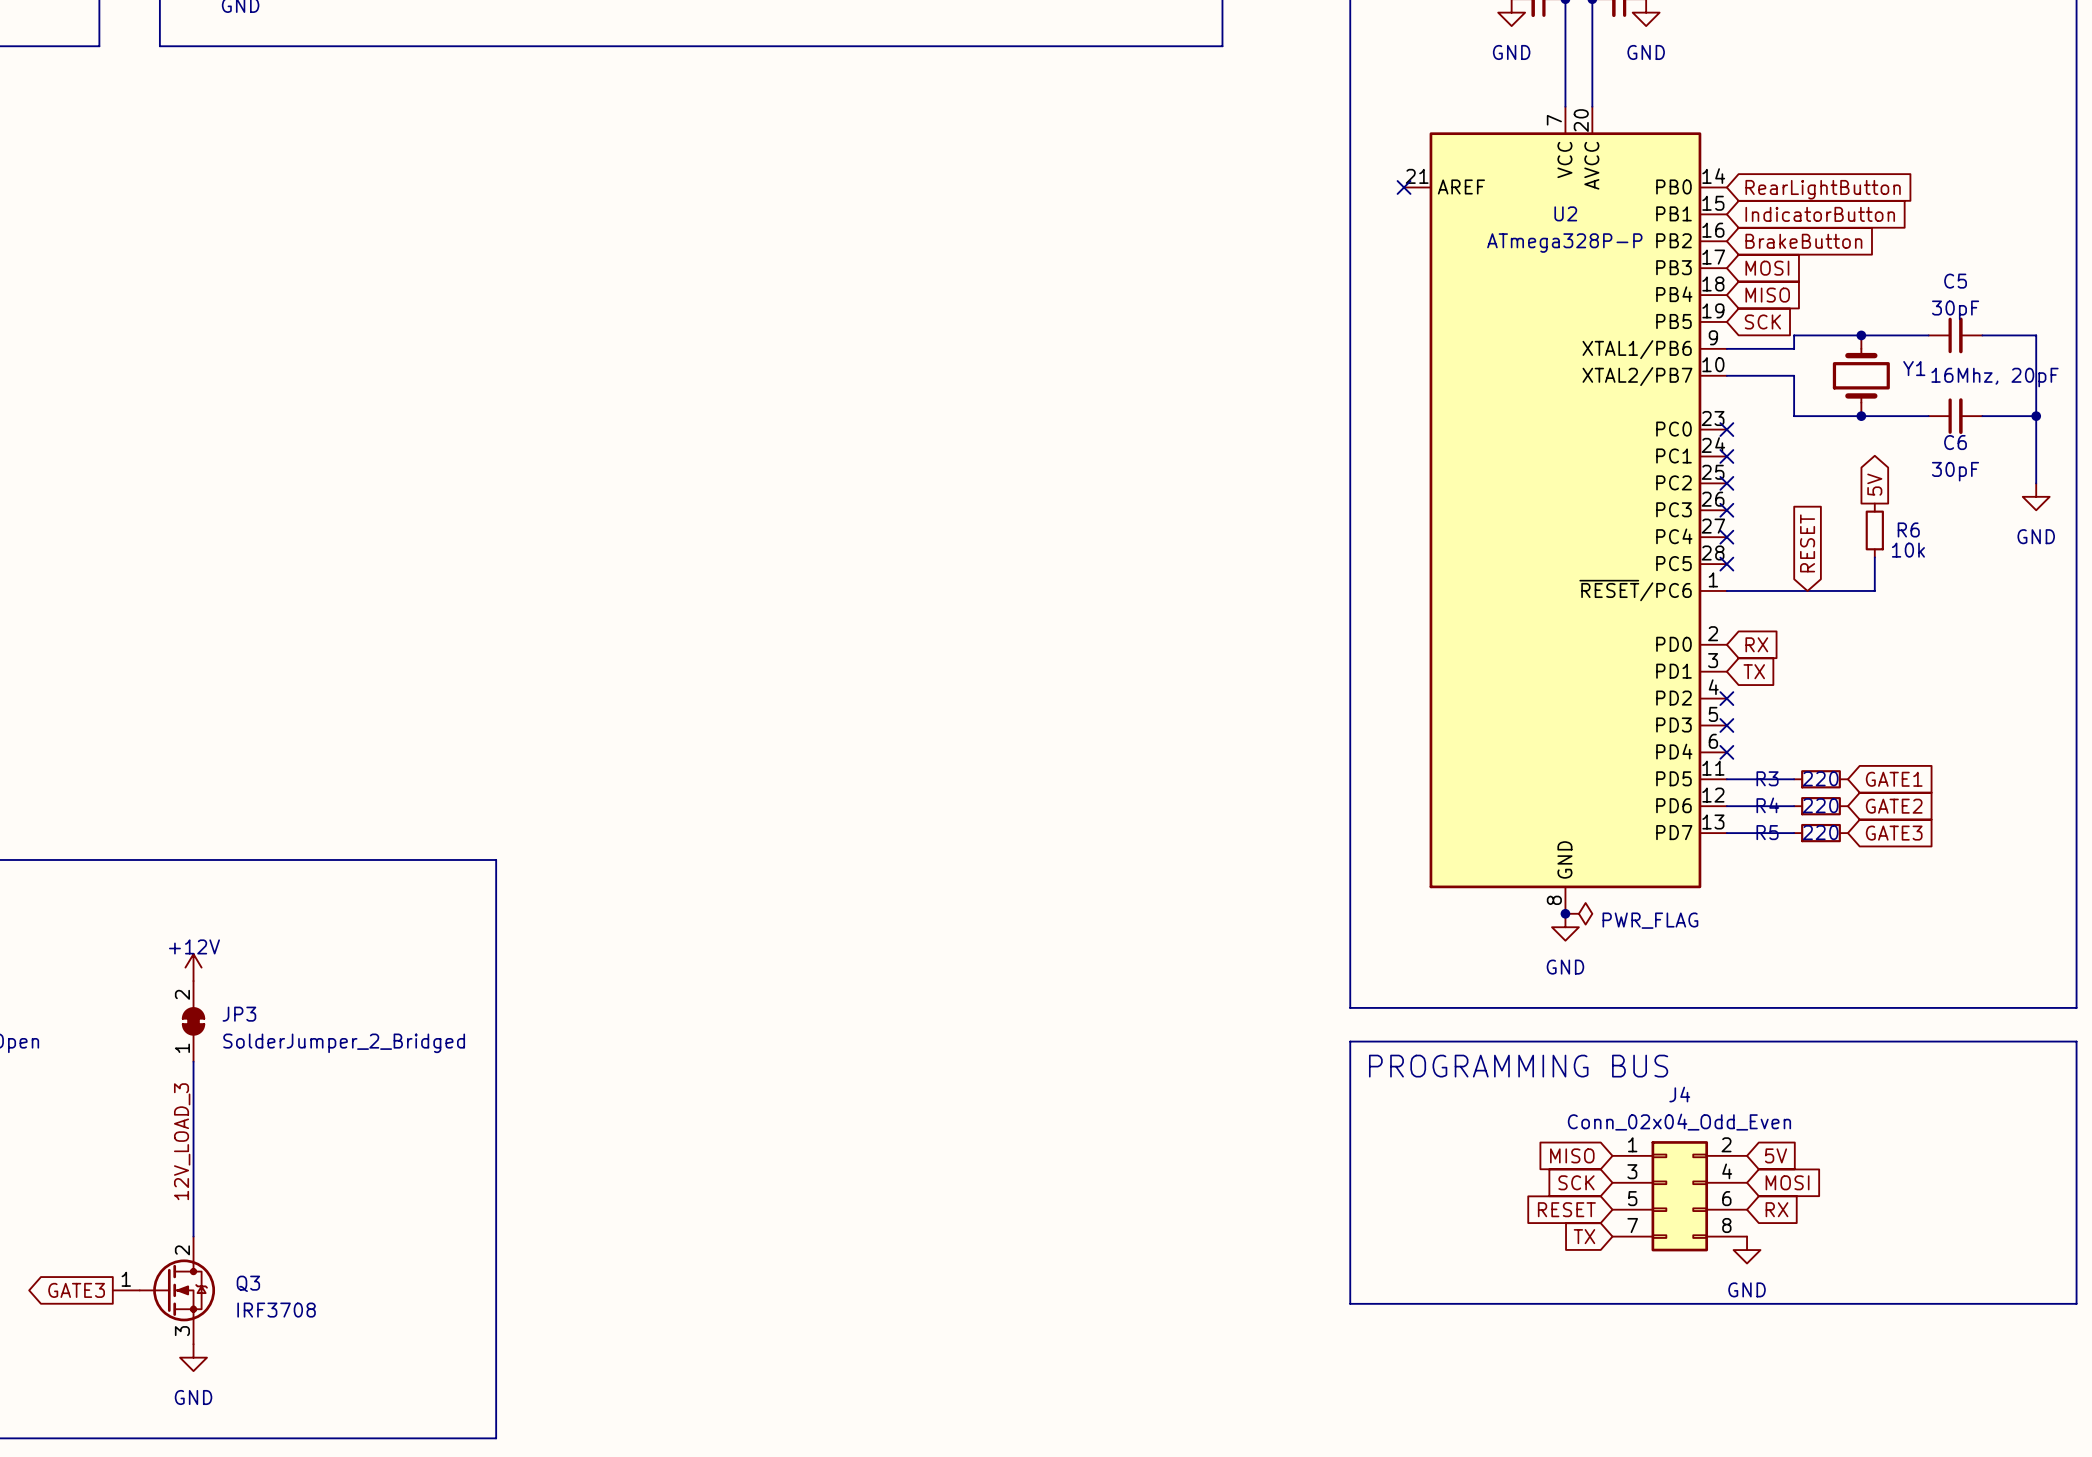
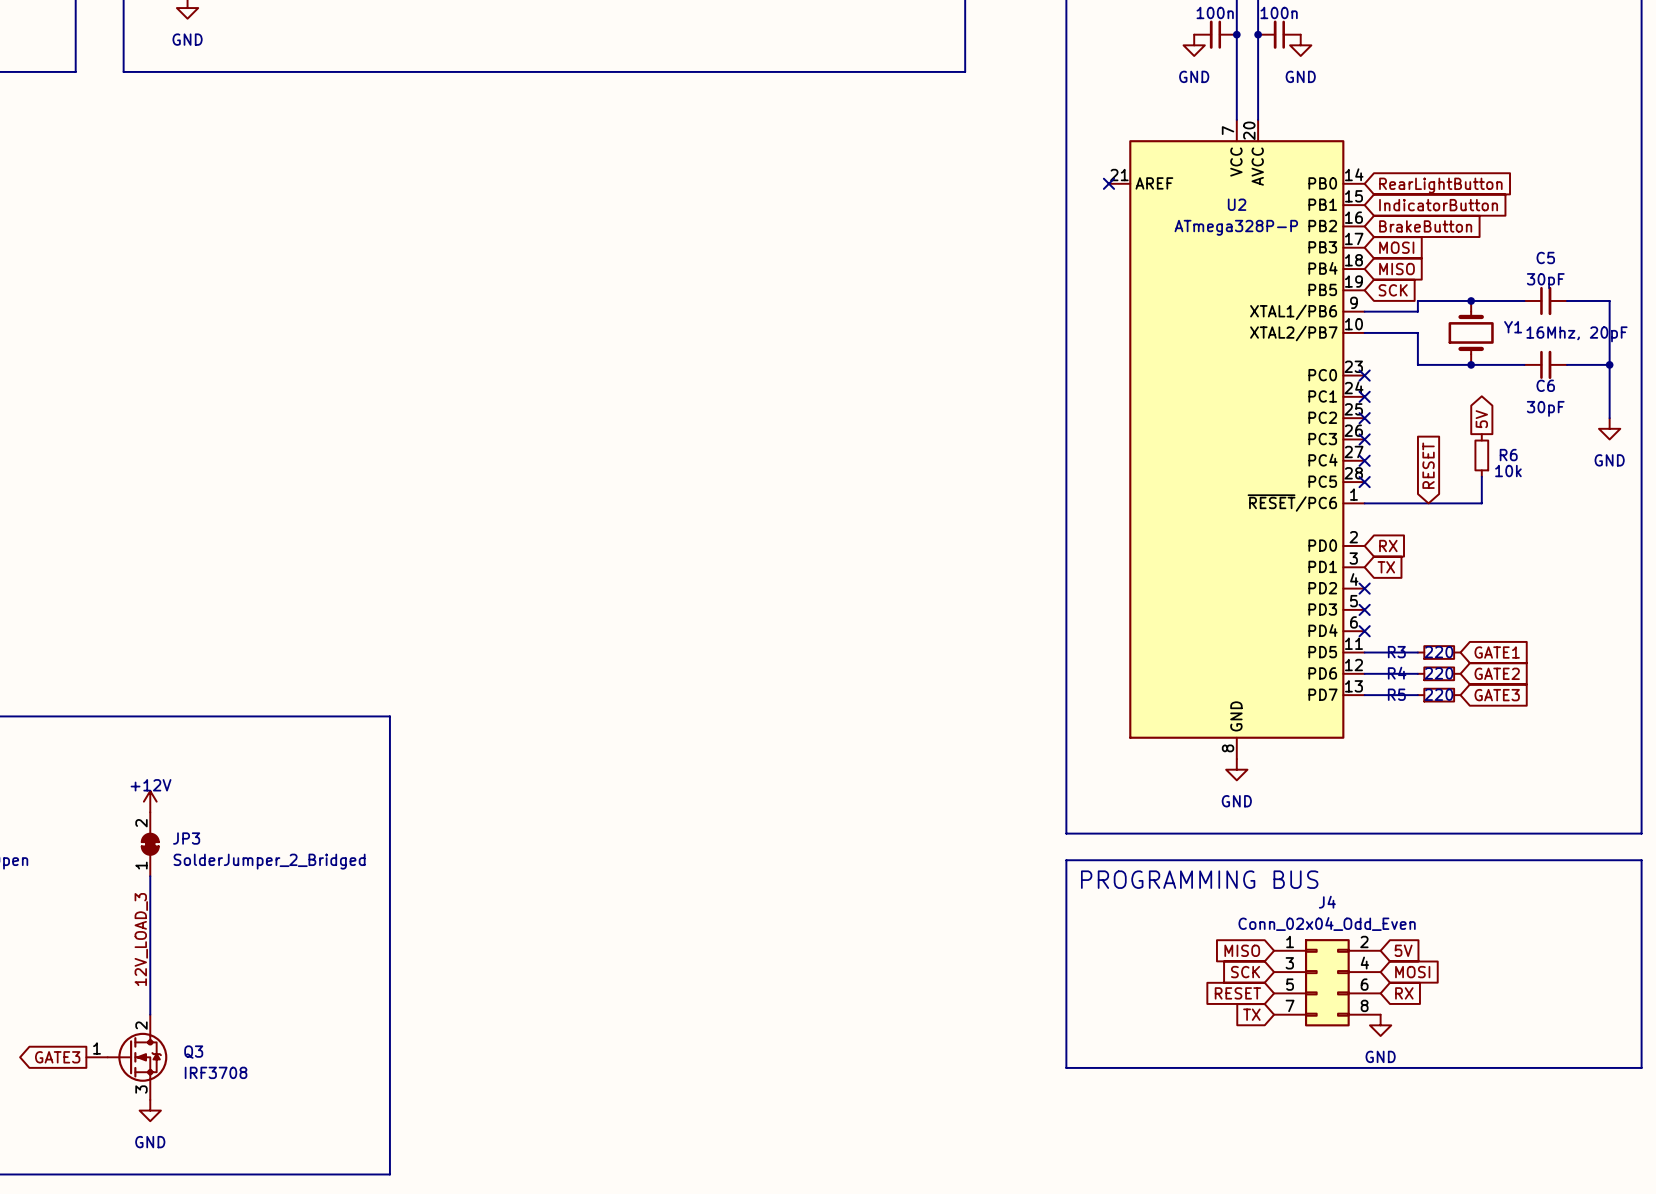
junction: (1565, 913) -> none
power symbol: PWR_FLAG (1578, 913) -> none

